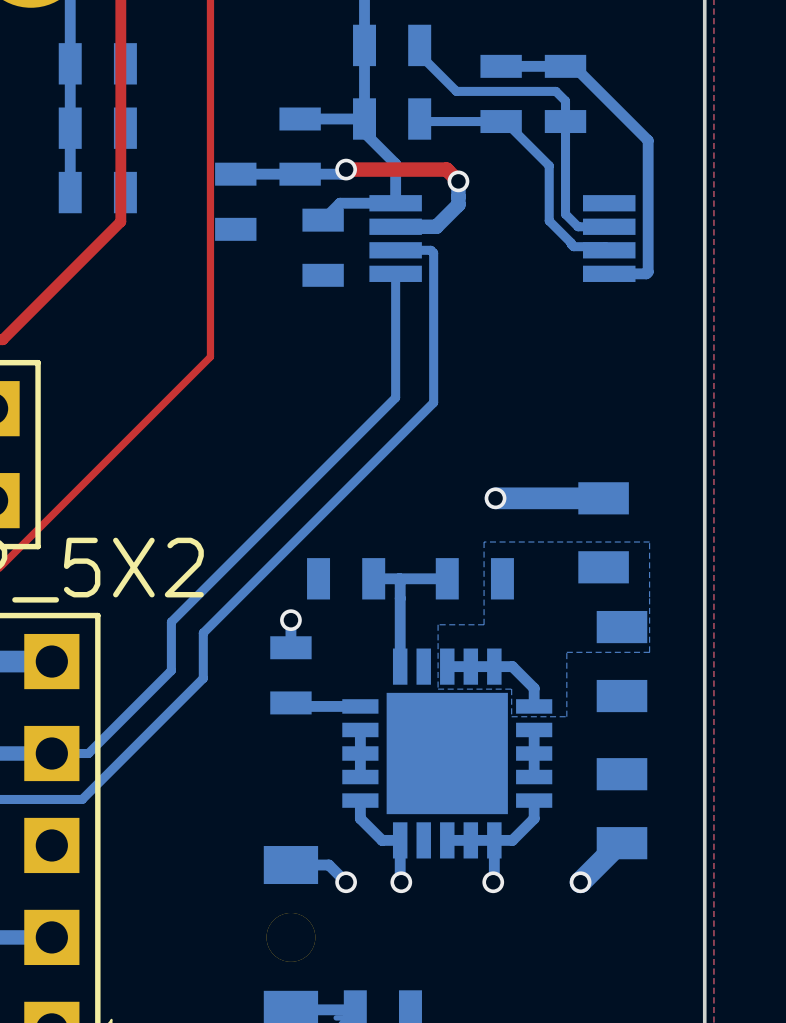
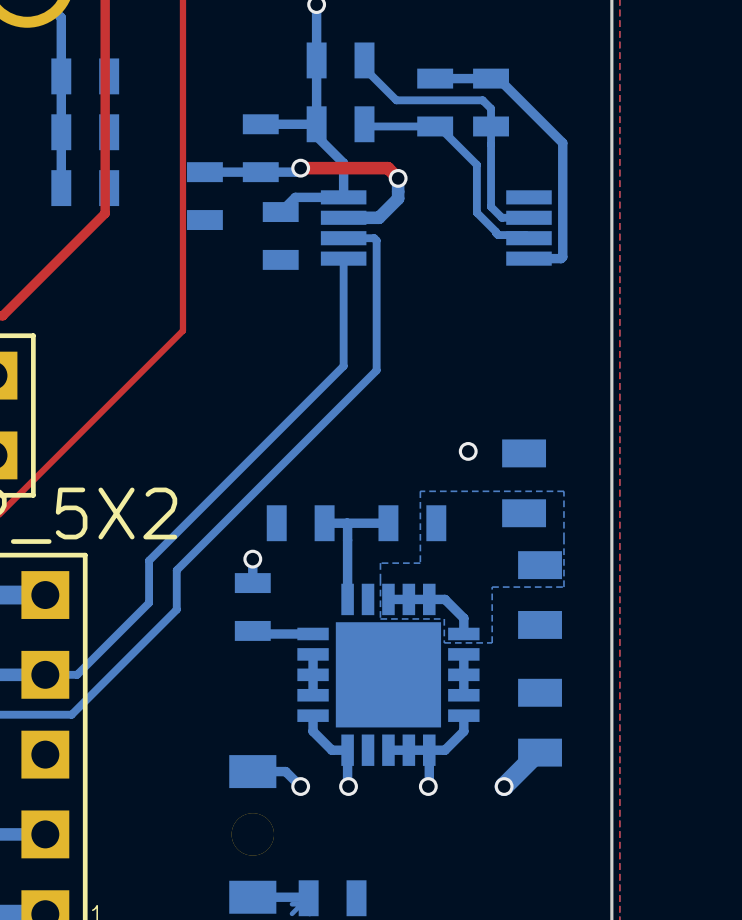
bottom track: (495, 498) (603, 498) -> none
via position: (495, 498) -> (468, 451)

